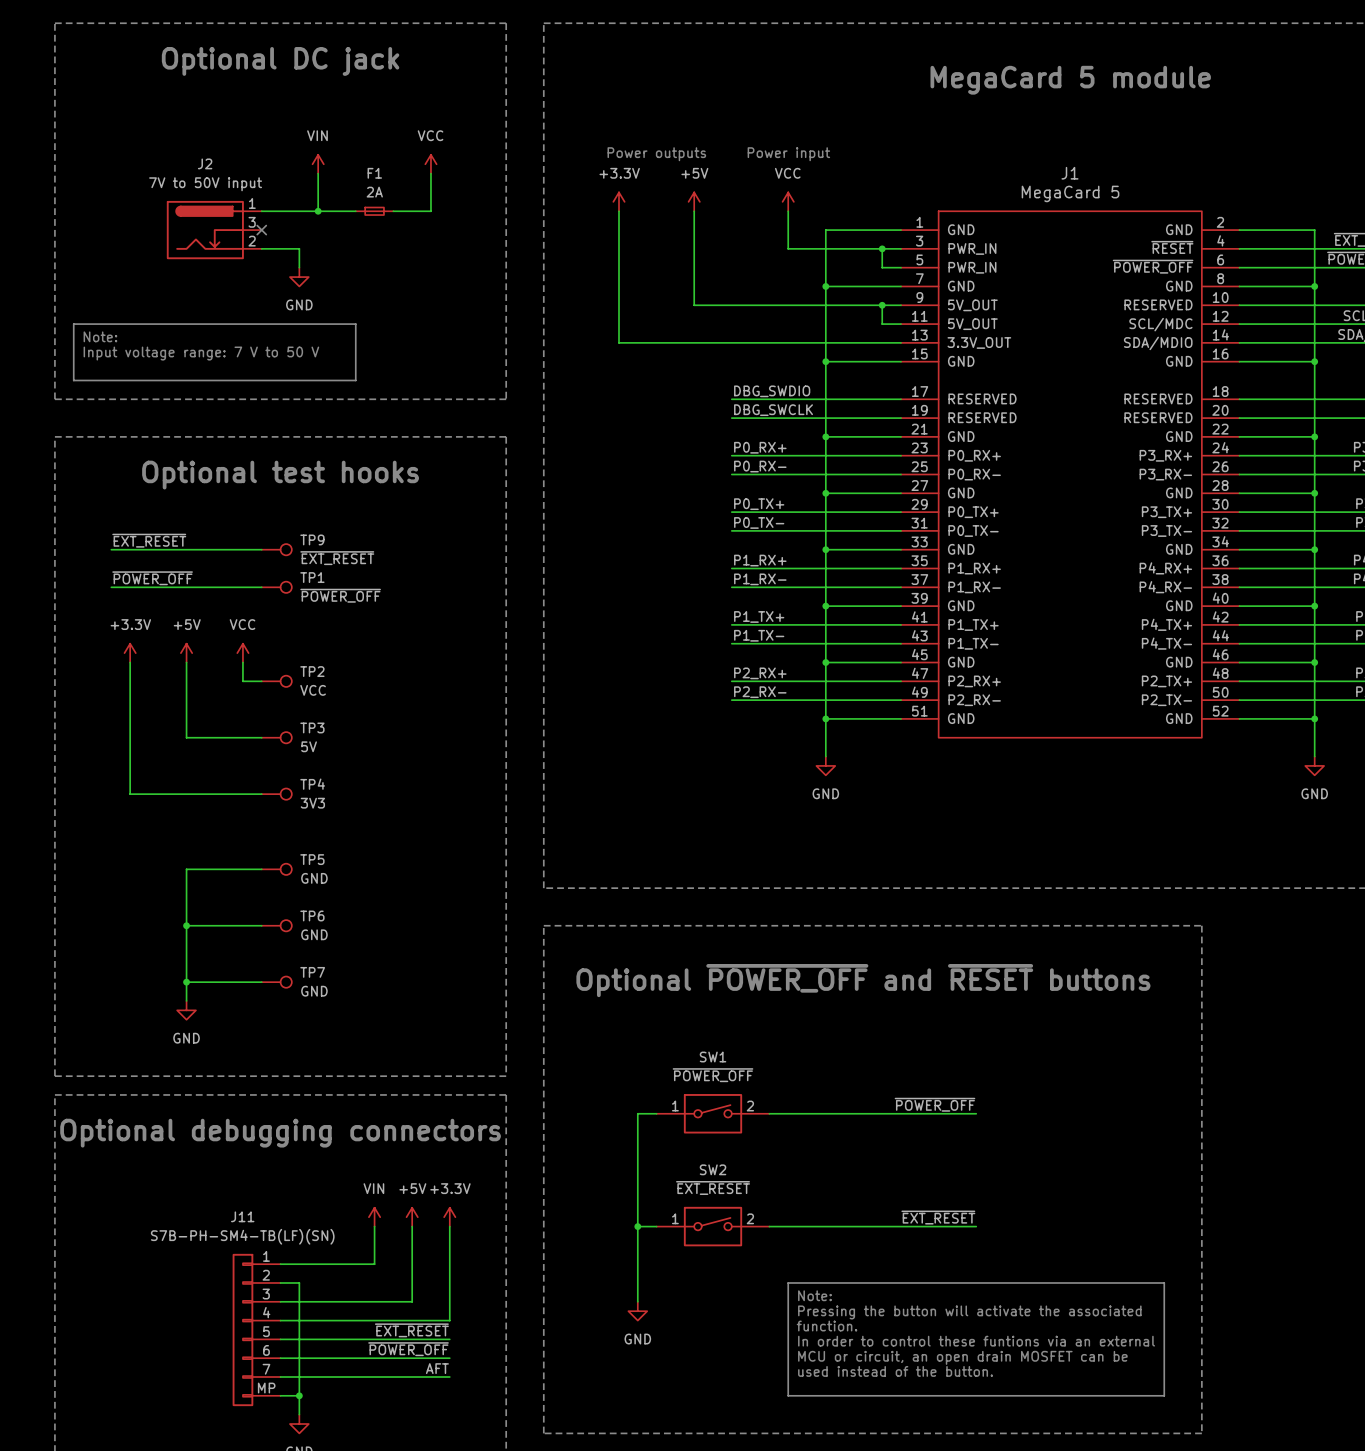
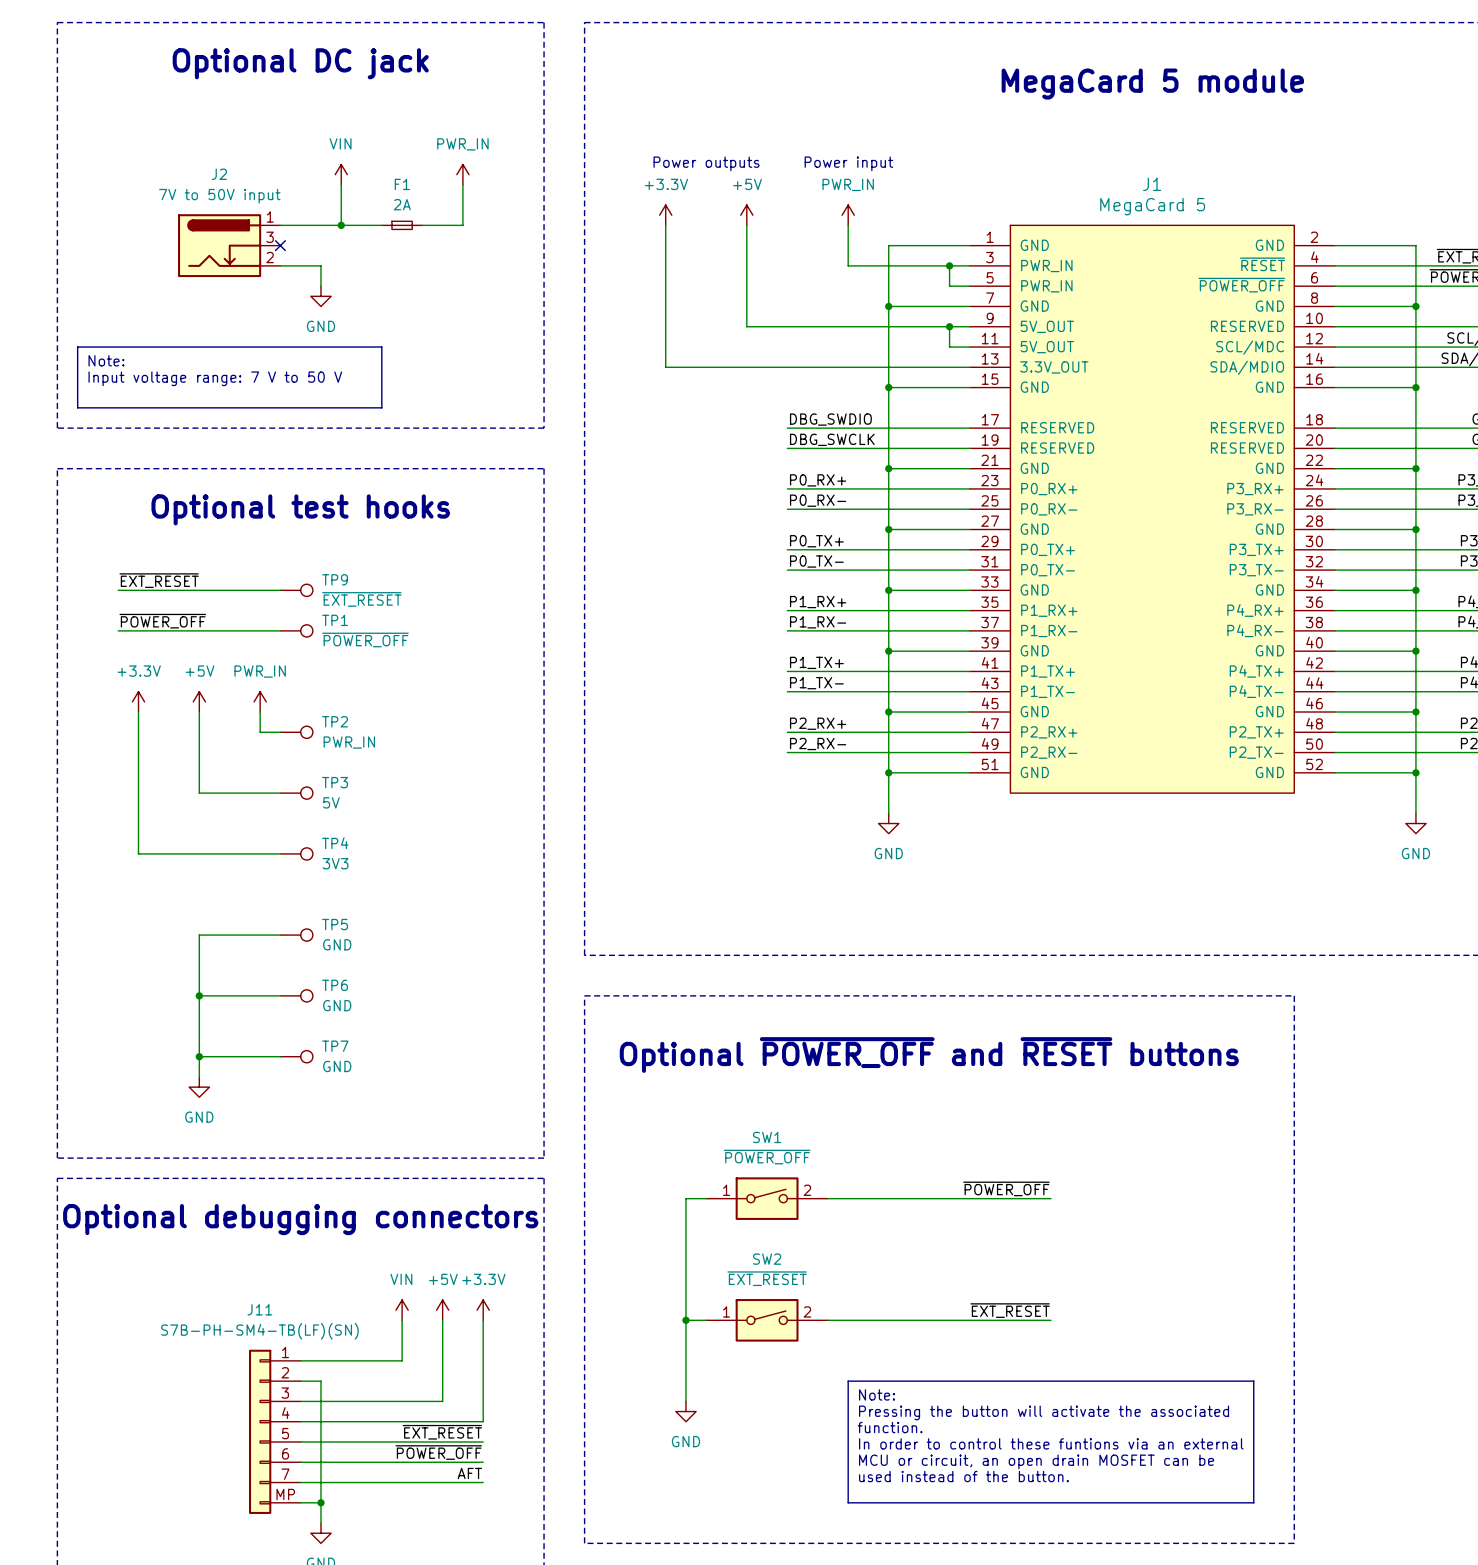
power symbol: VCC (430, 164) -> PWR_IN (462, 174)
power symbol: VCC (788, 201) -> PWR_IN (848, 215)
power symbol: VCC (242, 653) -> PWR_IN (260, 701)
TP2 value: VCC (313, 690) -> PWR_IN (349, 742)

